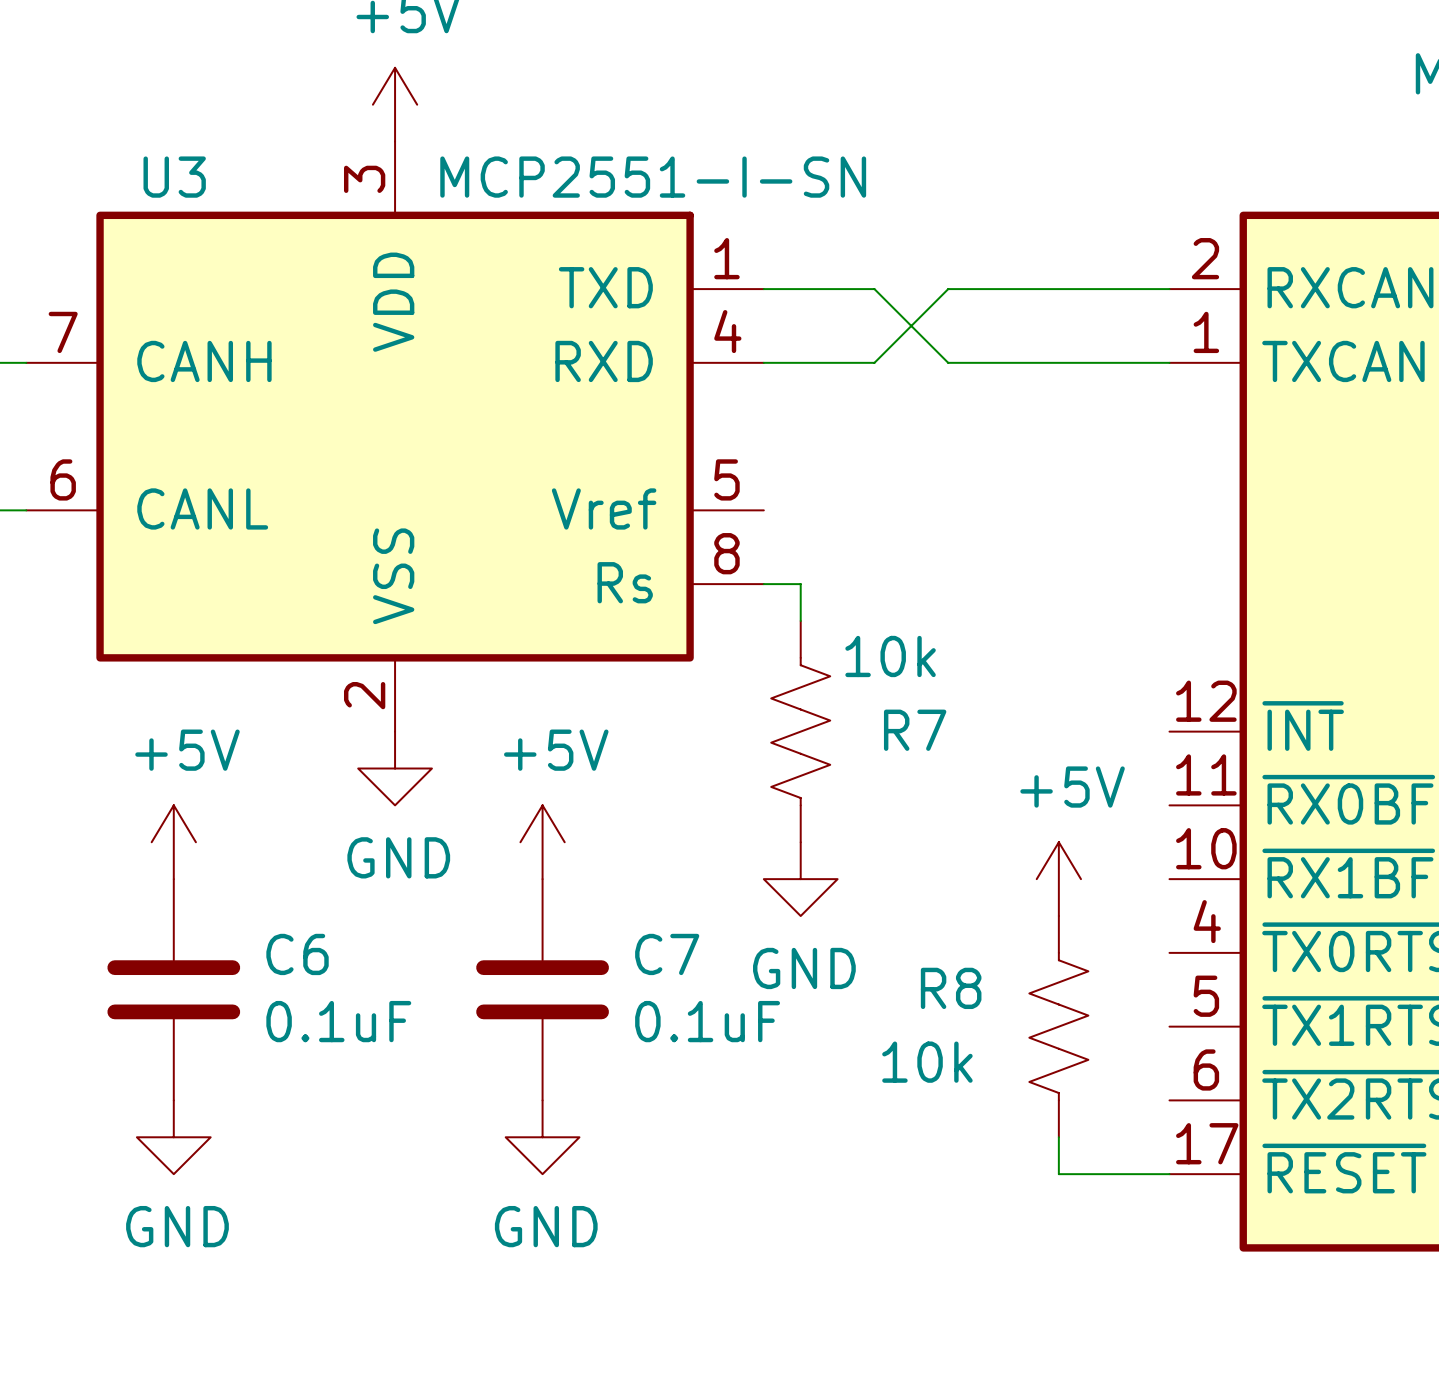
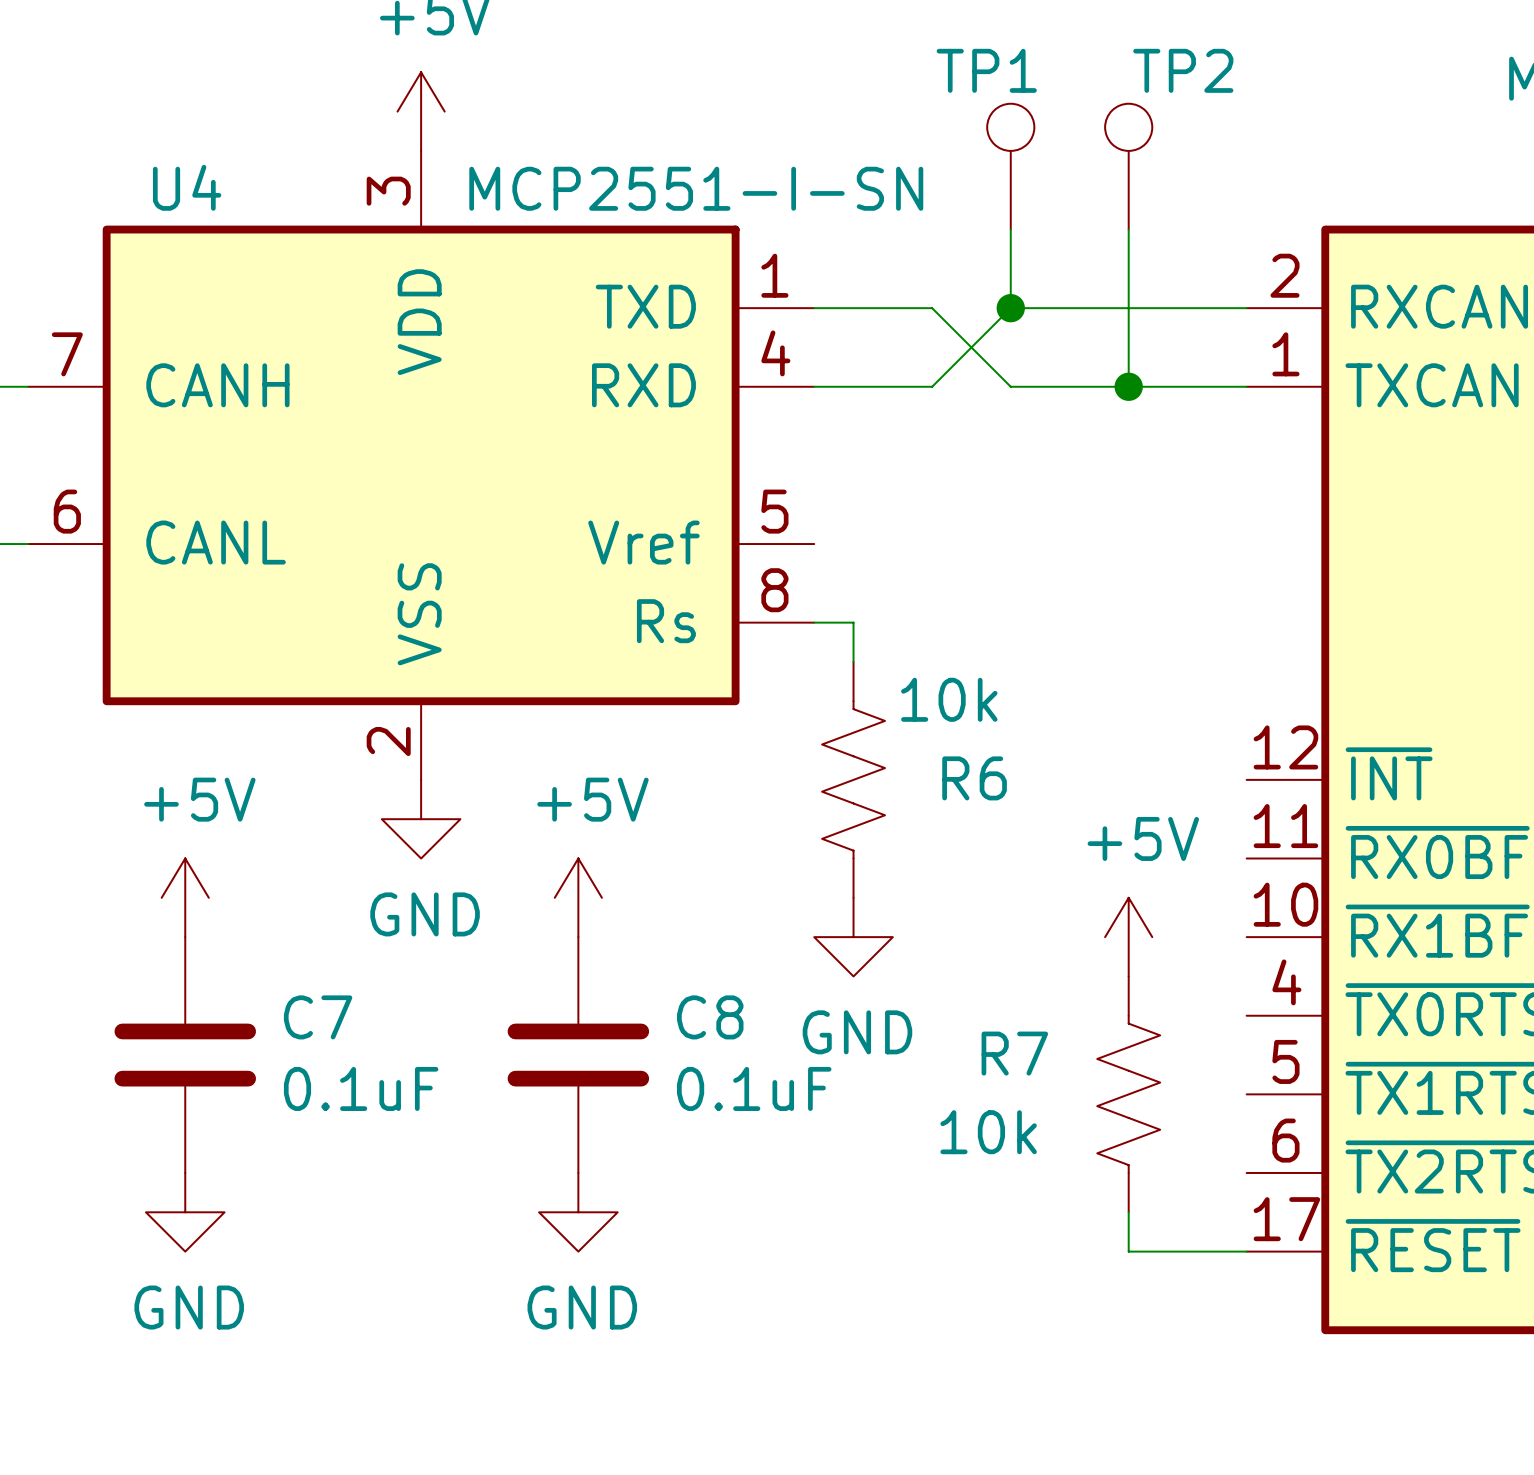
TP1: none -> (1010, 166)
TP2: none -> (1128, 166)
U3 name: U3 (174, 177) -> U4 (187, 187)
wire: none -> (1010, 229) (1010, 308)
wire: none -> (1128, 229) (1128, 386)
junction: none -> (1010, 308)
junction: none -> (1128, 386)
R7 name: R7 (915, 730) -> R6 (974, 778)
C6 name: C6 (297, 954) -> C7 (318, 1017)
C7 name: C7 (667, 954) -> C8 (710, 1017)
R8 name: R8 (951, 988) -> R7 (1014, 1053)

